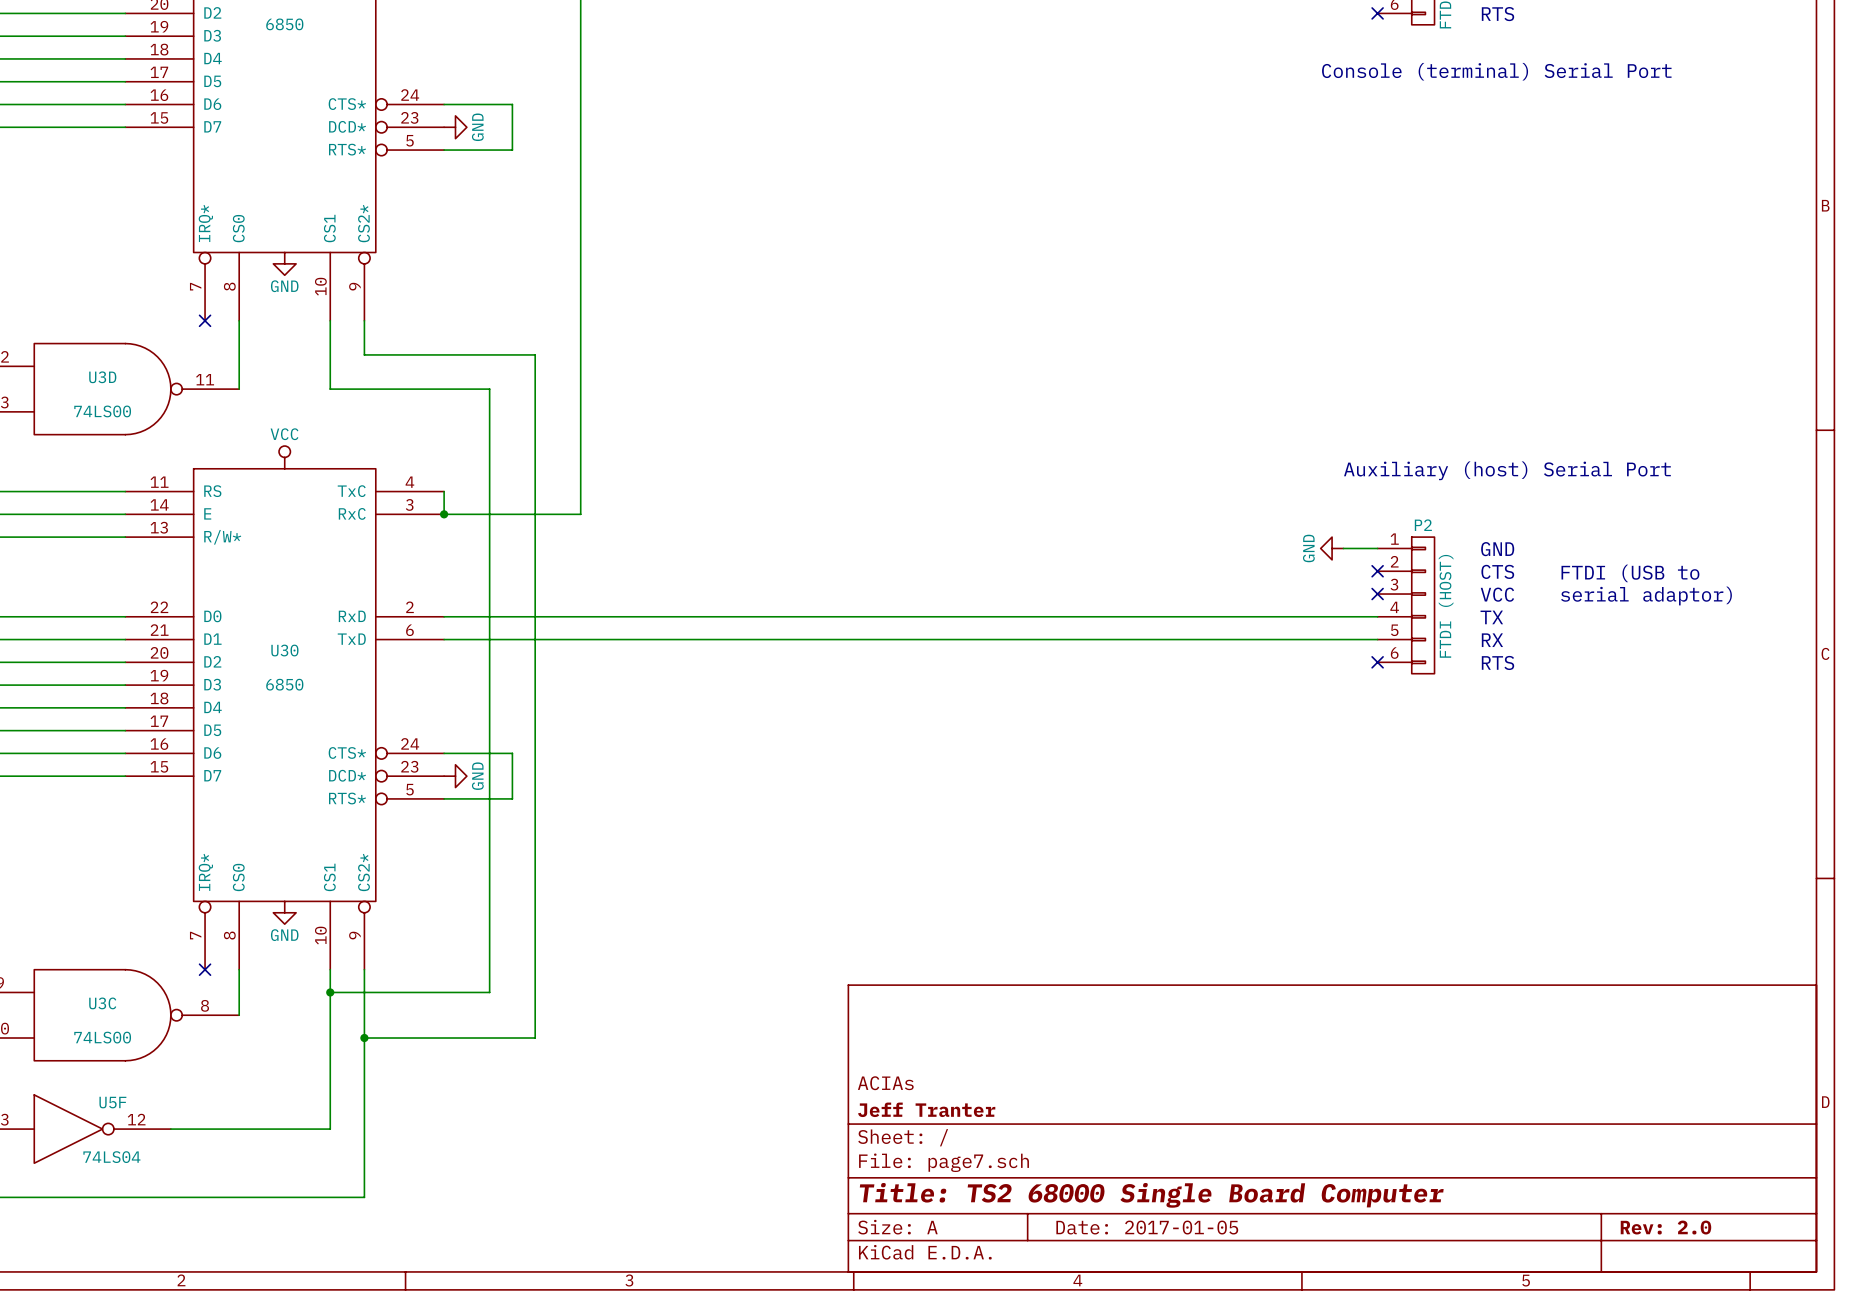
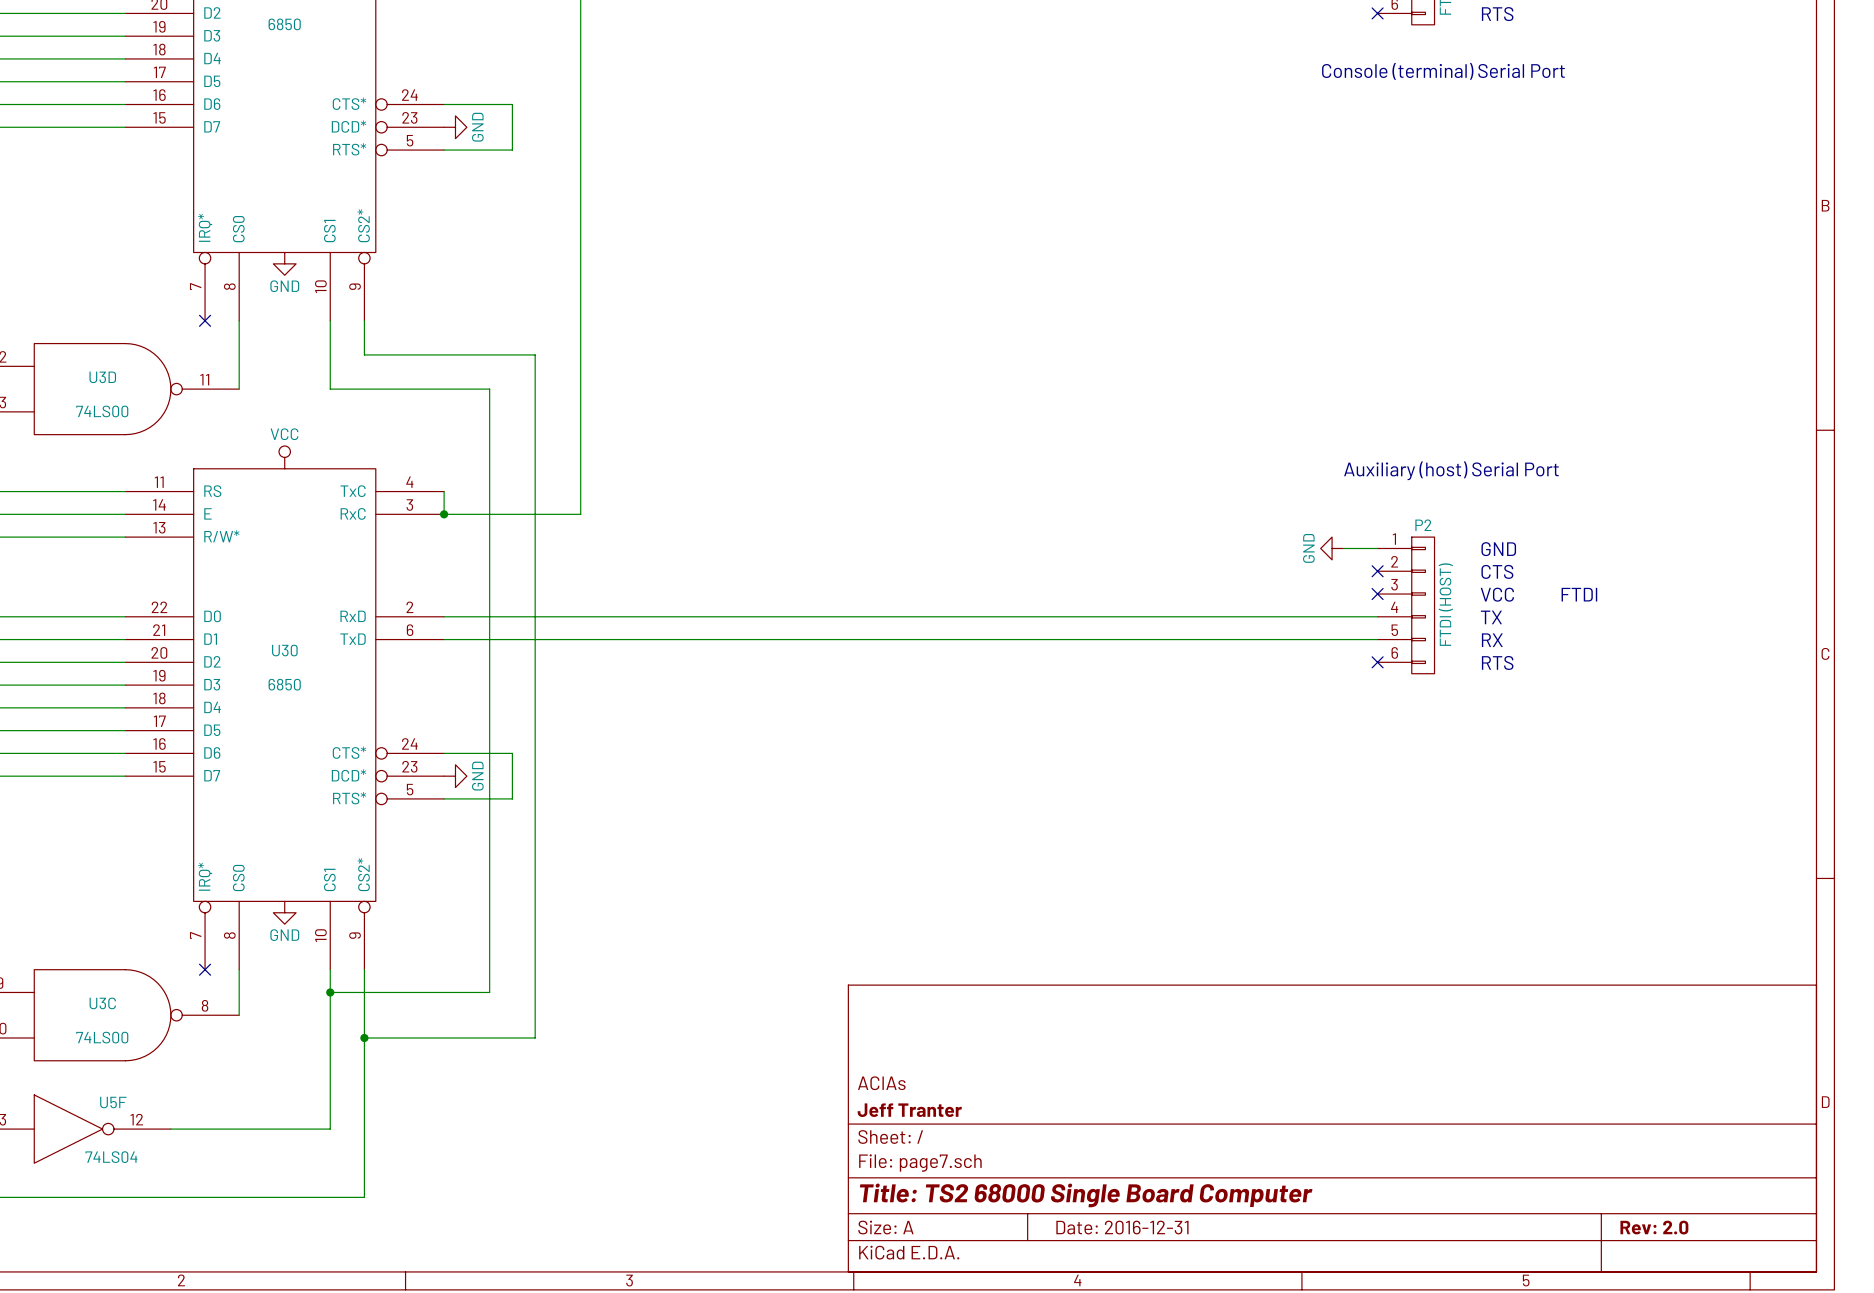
text: FTDI (USB to (1630, 573) -> none
text: serial adaptor) (1646, 596) -> FTDI (1579, 594)
title block: Date: 2017-01-05 (1147, 1227) -> Date: 2016-12-31 (1122, 1227)

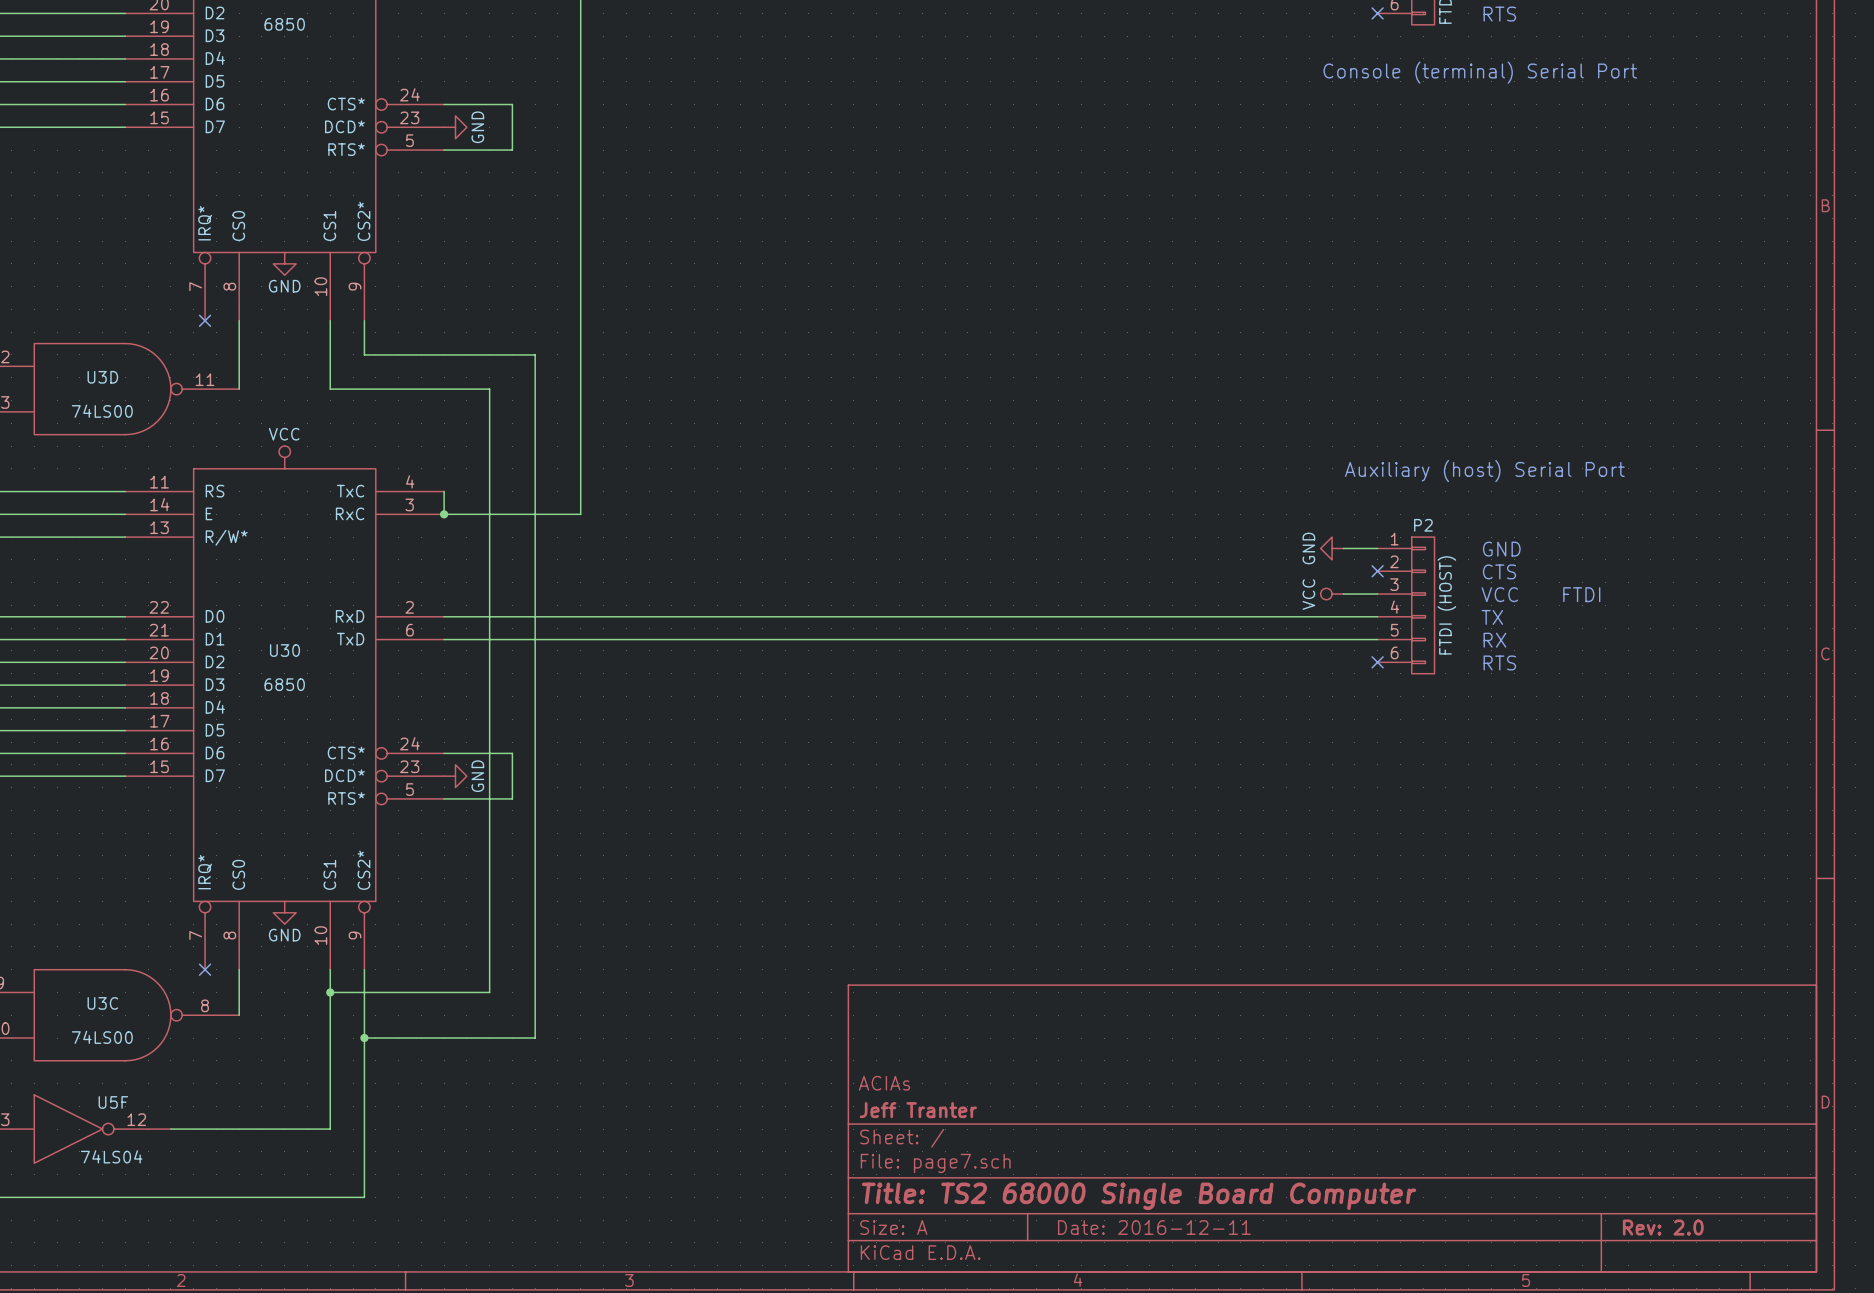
power symbol: none -> VCC (1332, 594)
wire: none -> (1343, 594) (1377, 594)
no-connect mark: (1377, 594) -> none
title block: Date: 2016-12-31 (1122, 1227) -> Date: 2016-12-11 (1154, 1227)

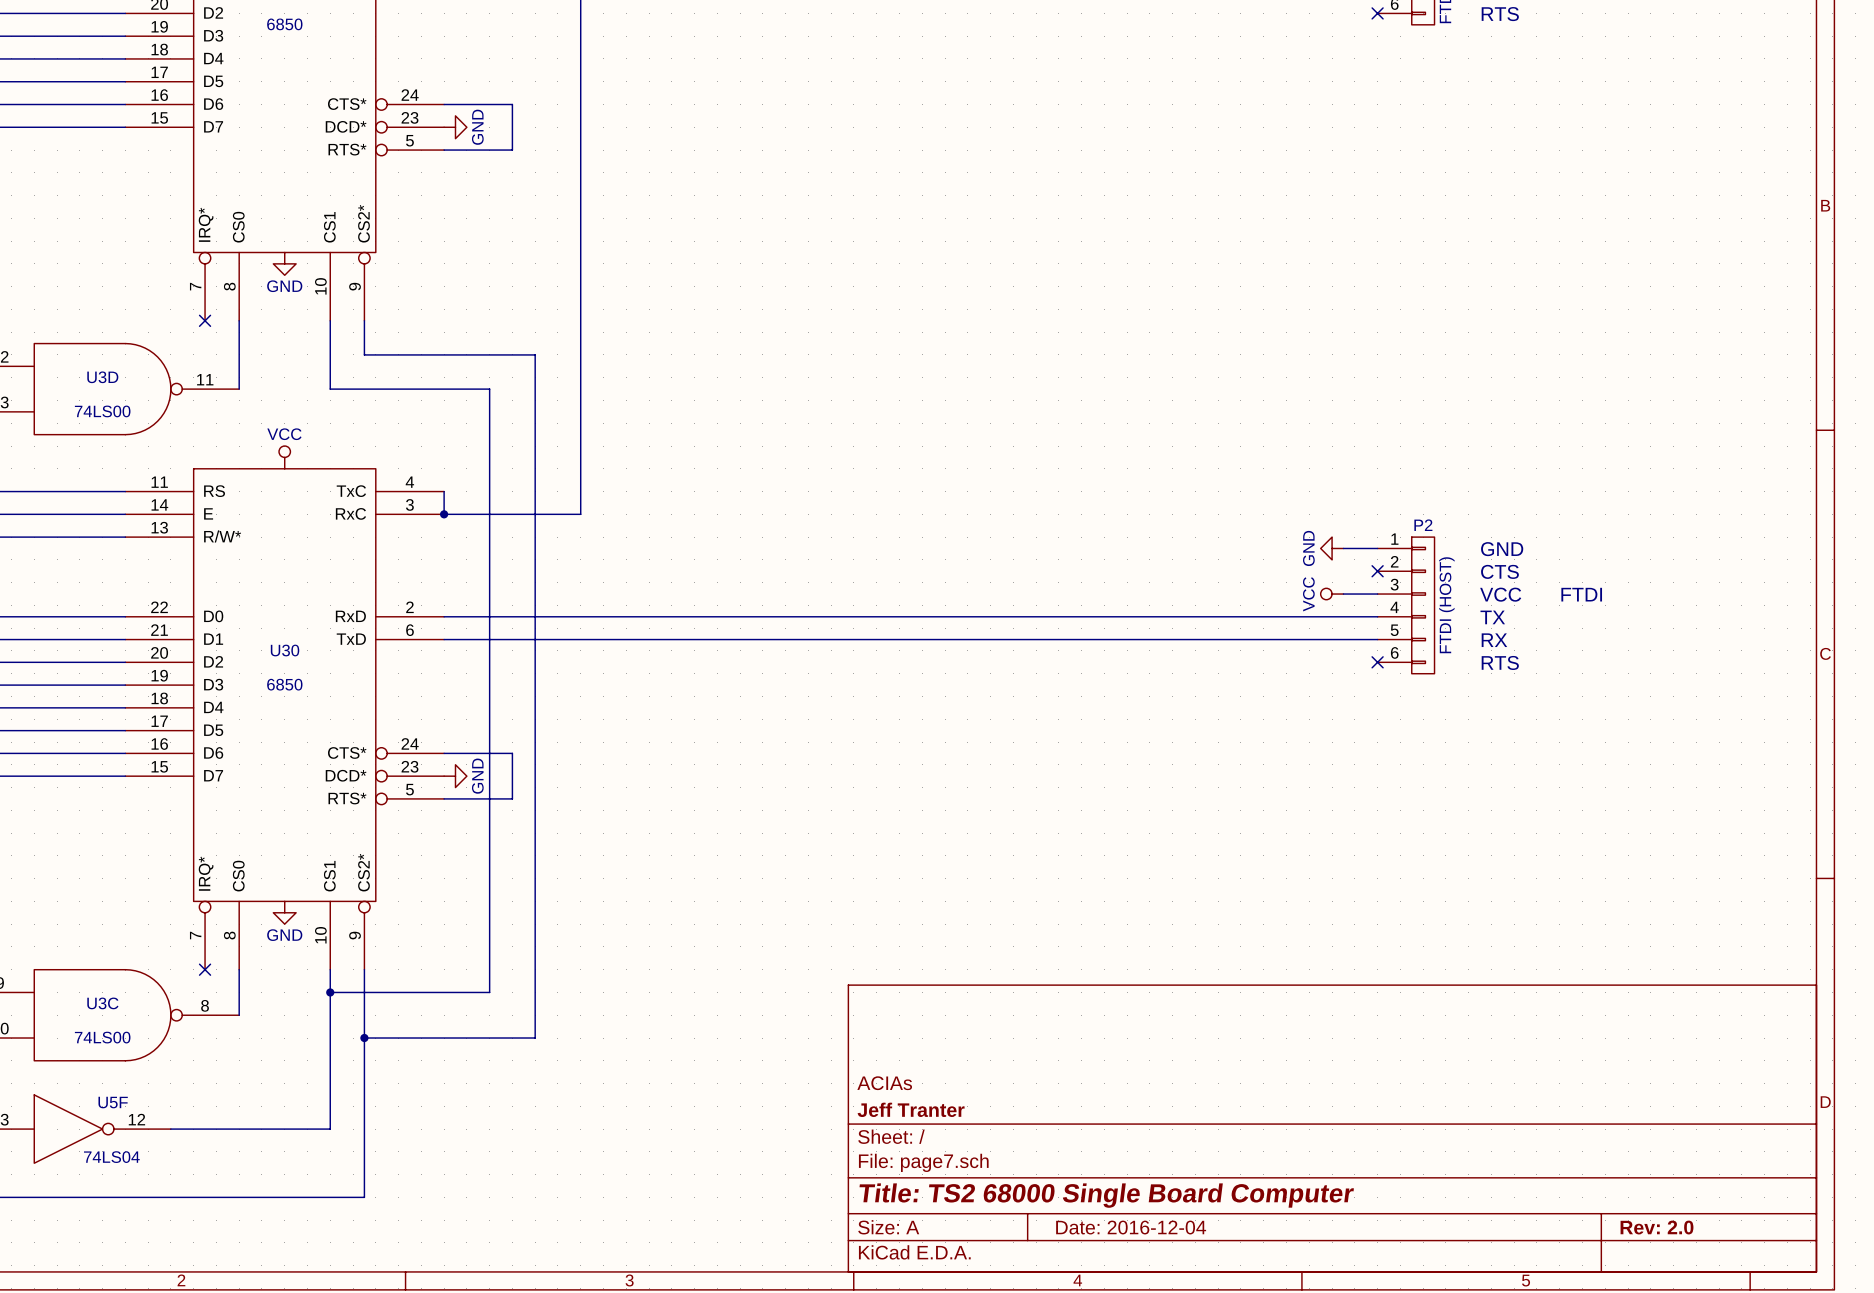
text: Console (terminal) Serial Port (1480, 72) -> none
text: Auxiliary (host) Serial Port (1484, 471) -> none
title block: Date: 2016-12-11 (1154, 1227) -> Date: 2016-12-04 (1131, 1227)

